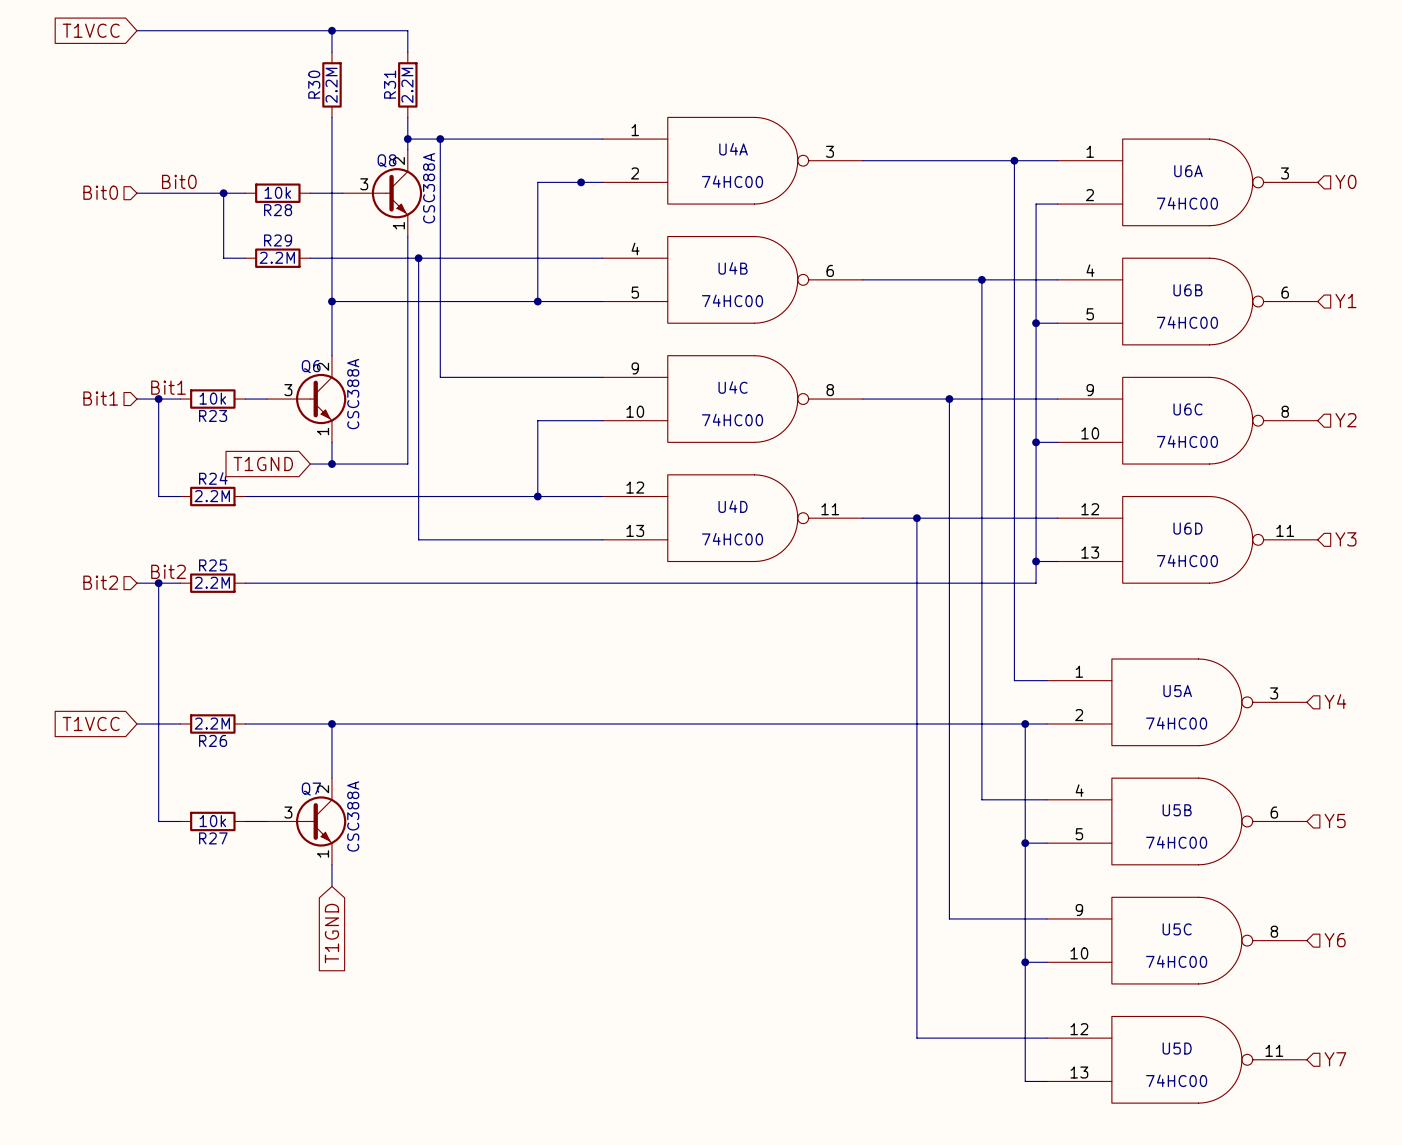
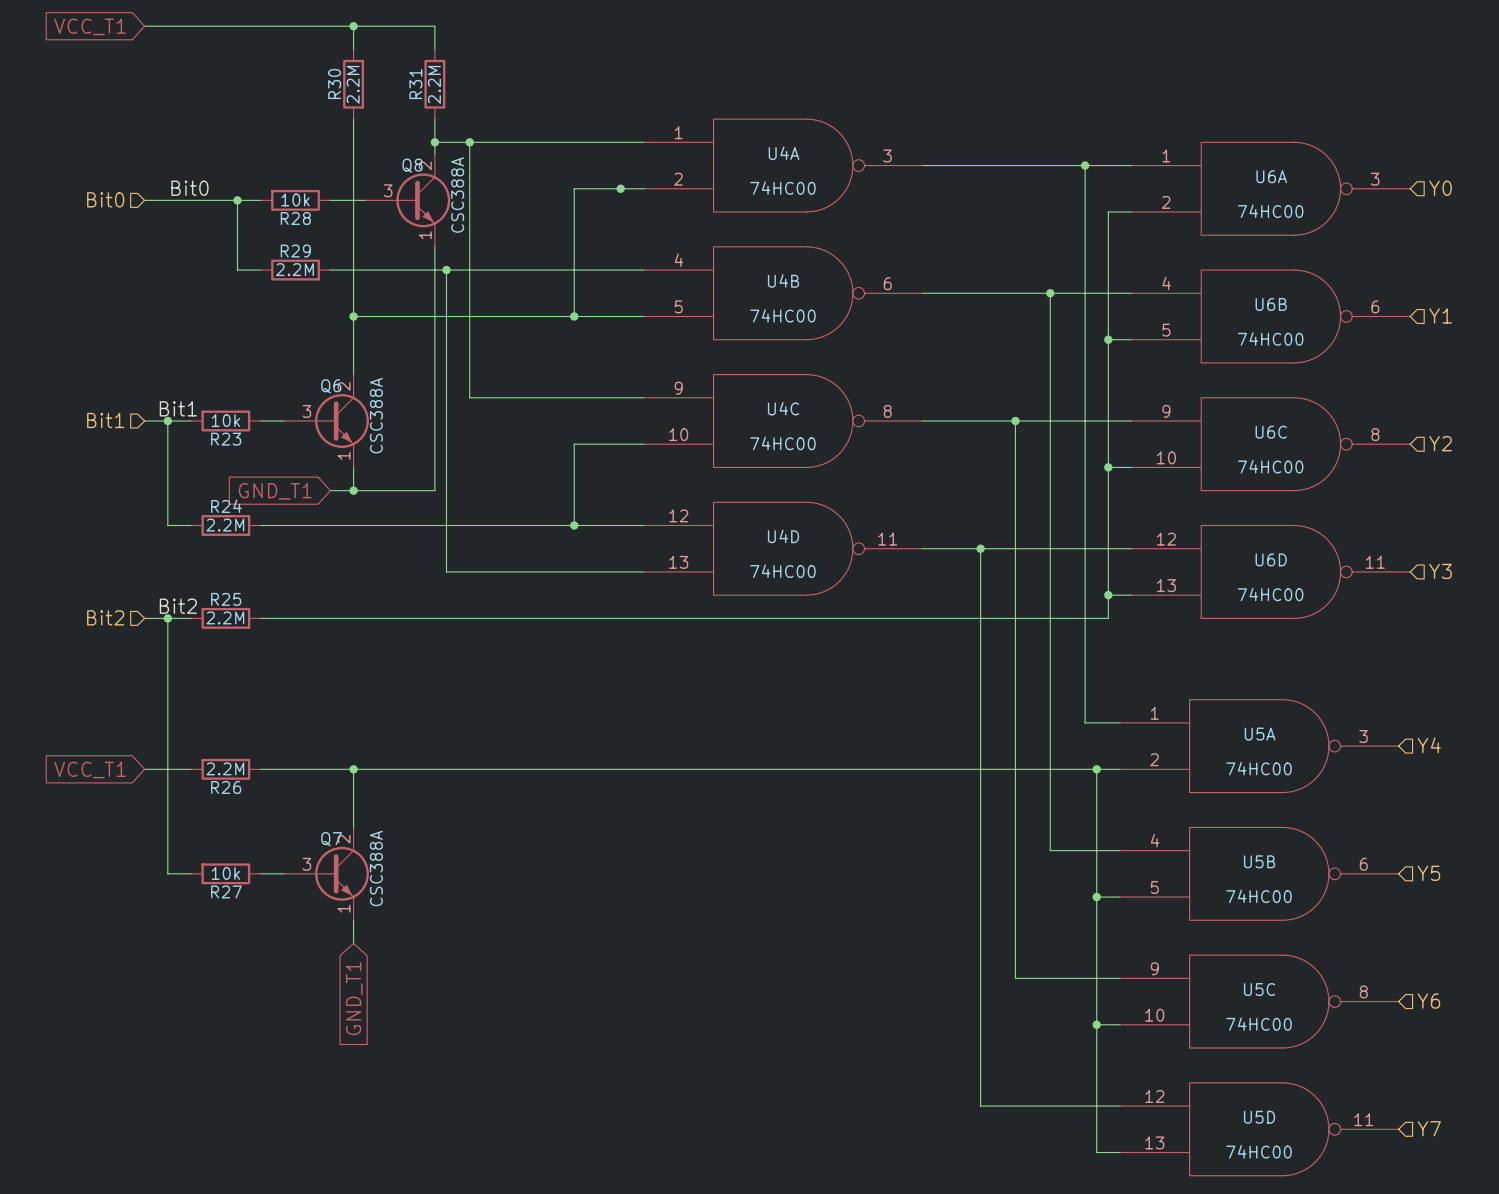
global label: T1VCC (91, 30) -> VCC_T1 (90, 26)
global label: T1GND (263, 464) -> GND_T1 (275, 491)
global label: T1VCC (91, 723) -> VCC_T1 (90, 770)
global label: T1GND (331, 933) -> GND_T1 (354, 998)

